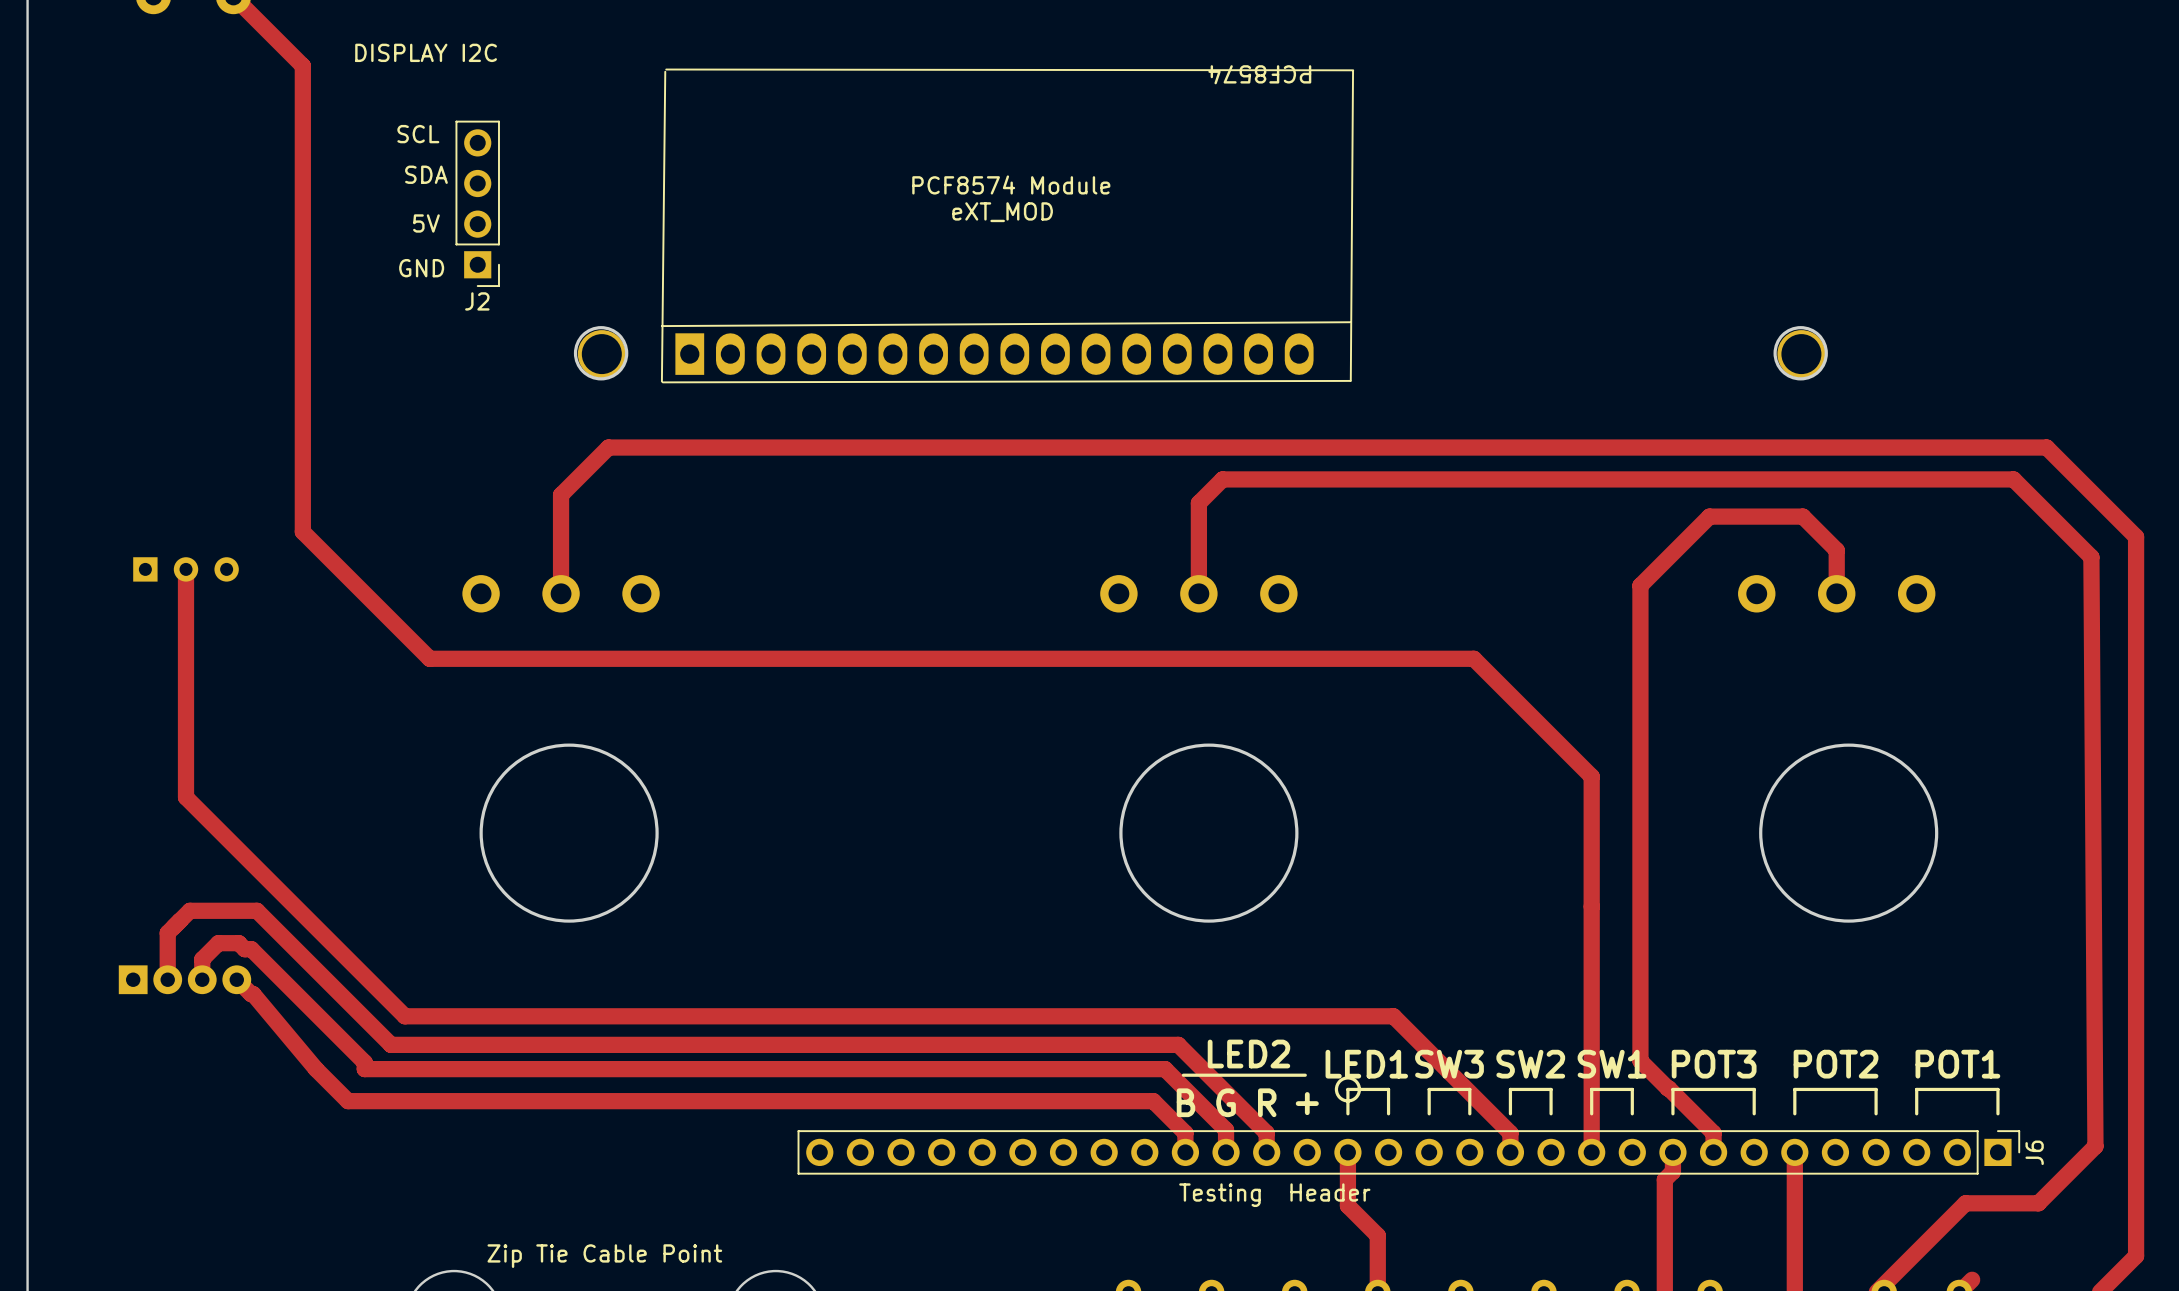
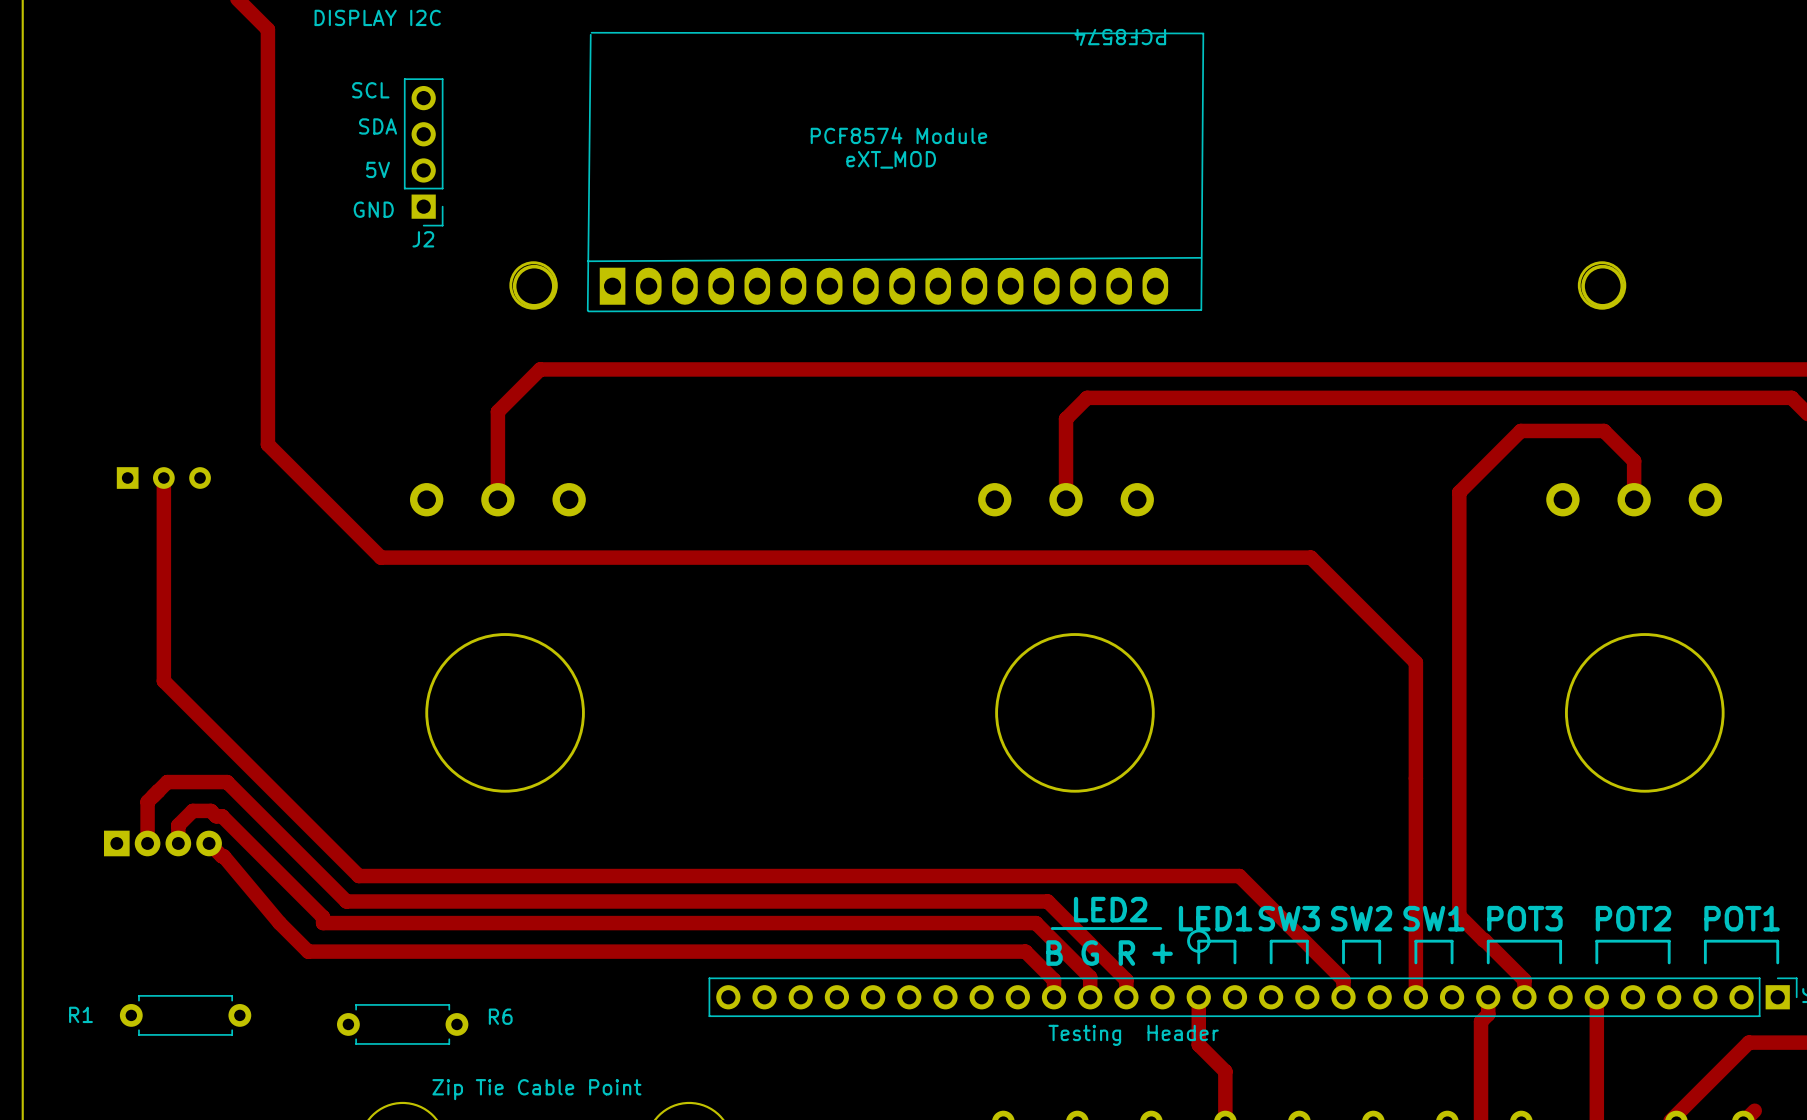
R1: none -> (185, 1015)
R6: none -> (402, 1024)

